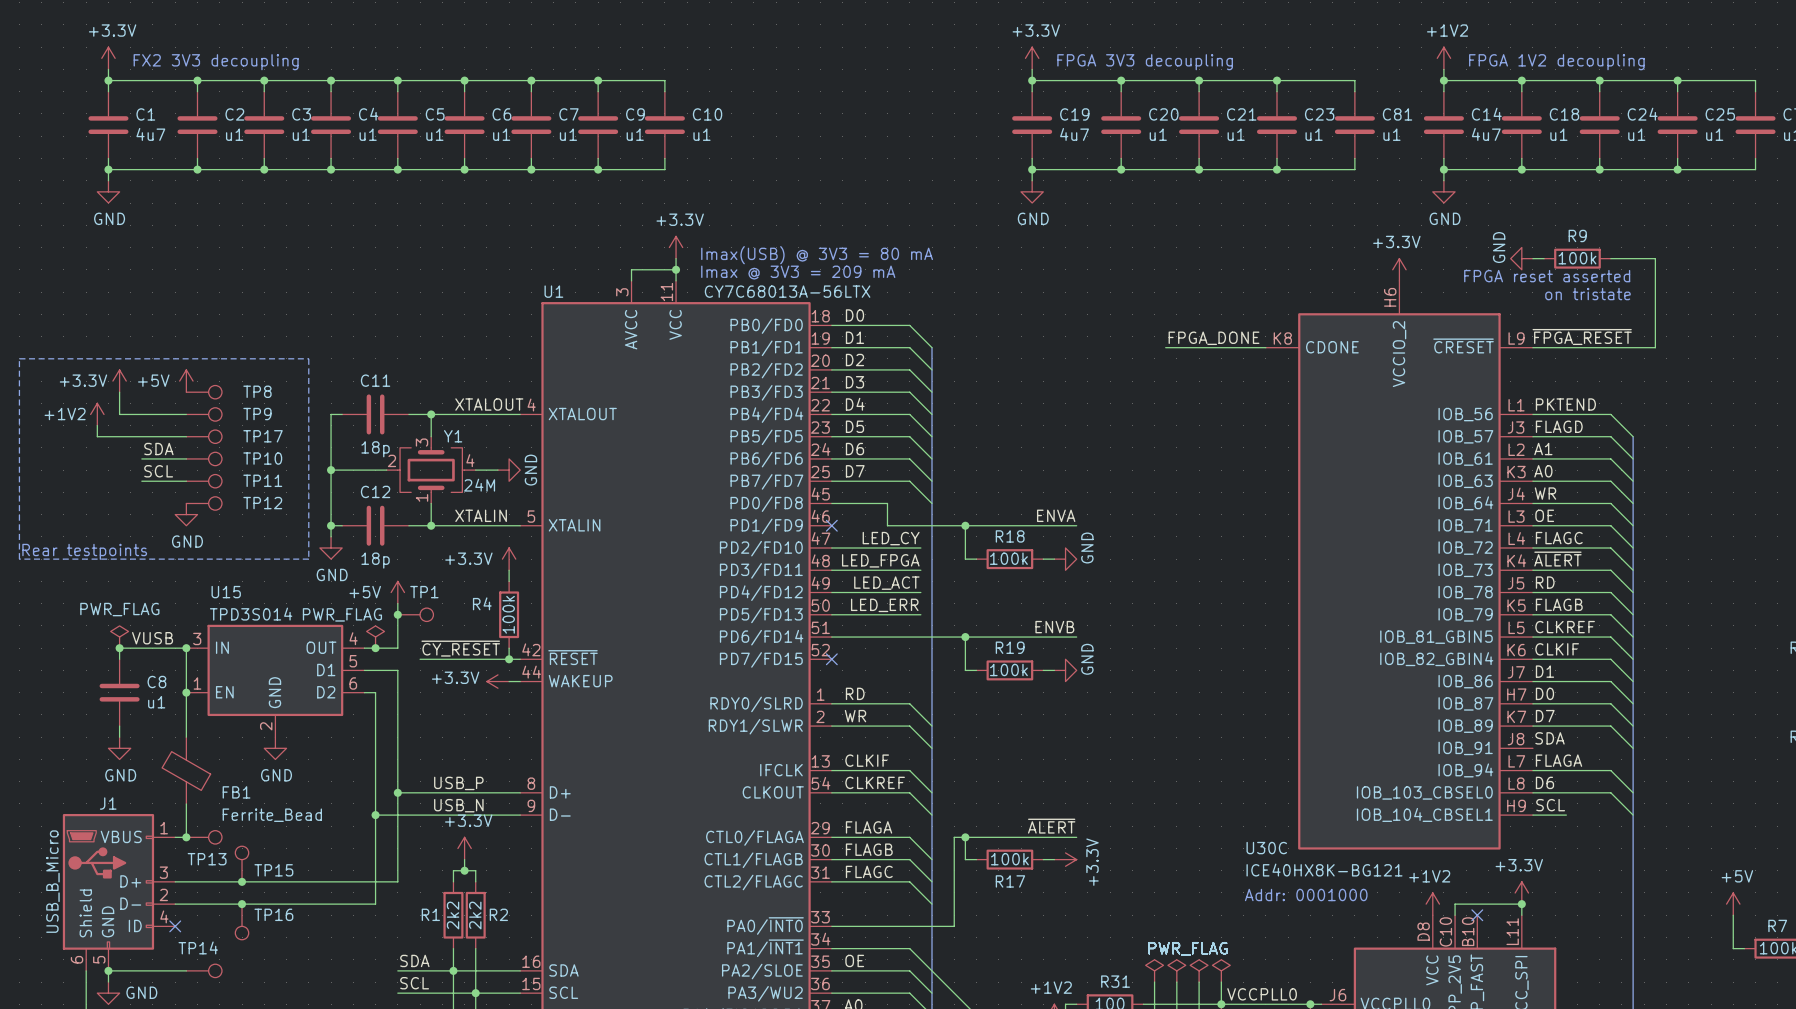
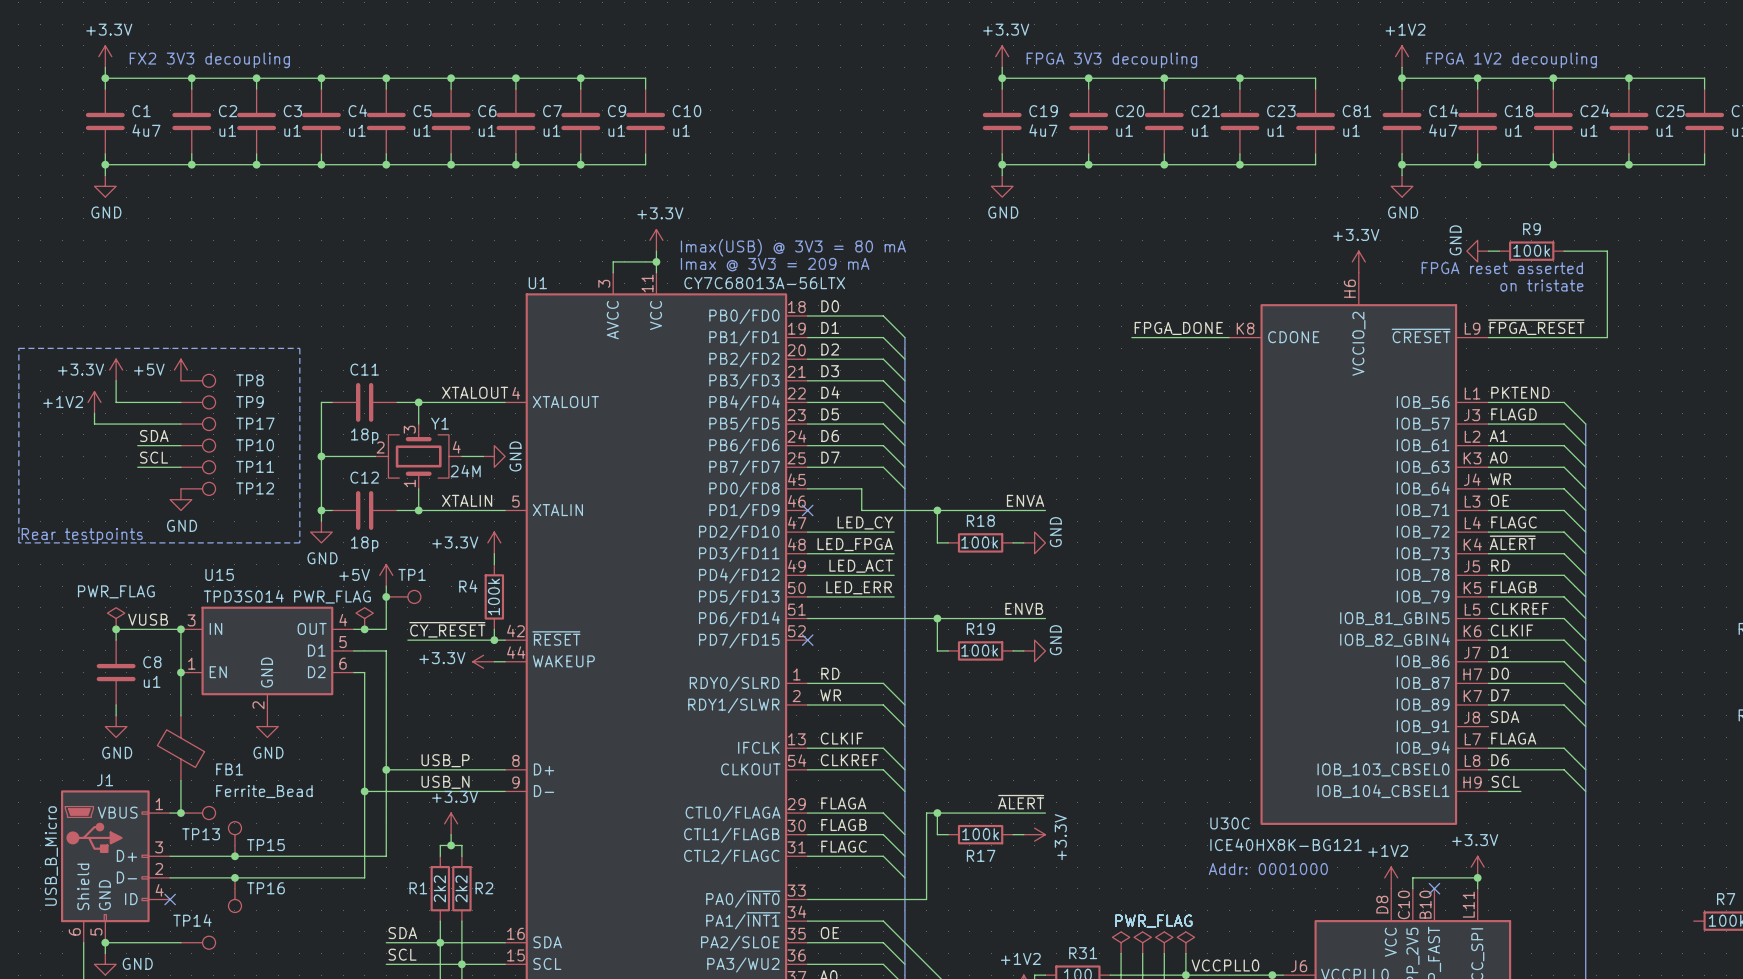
power symbol: +5V (1733, 904) -> none
wire: (1733, 915) (1733, 948) (1744, 948) -> none

